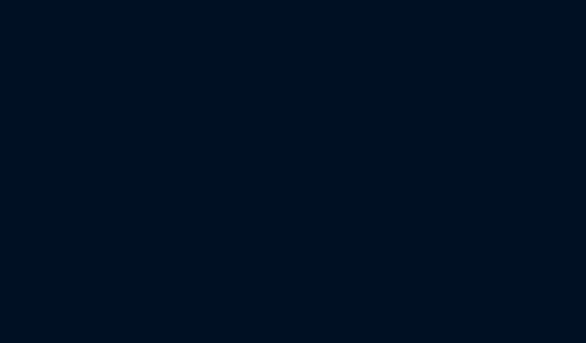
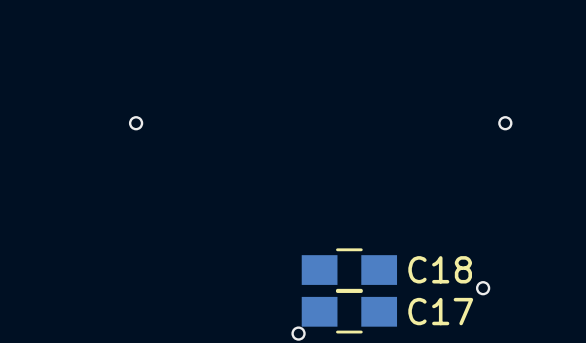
via: none -> (136, 123)
via: none -> (505, 123)
C18: none -> (349, 270)
via: none -> (483, 288)
C17: none -> (349, 311)
via: none -> (298, 333)

